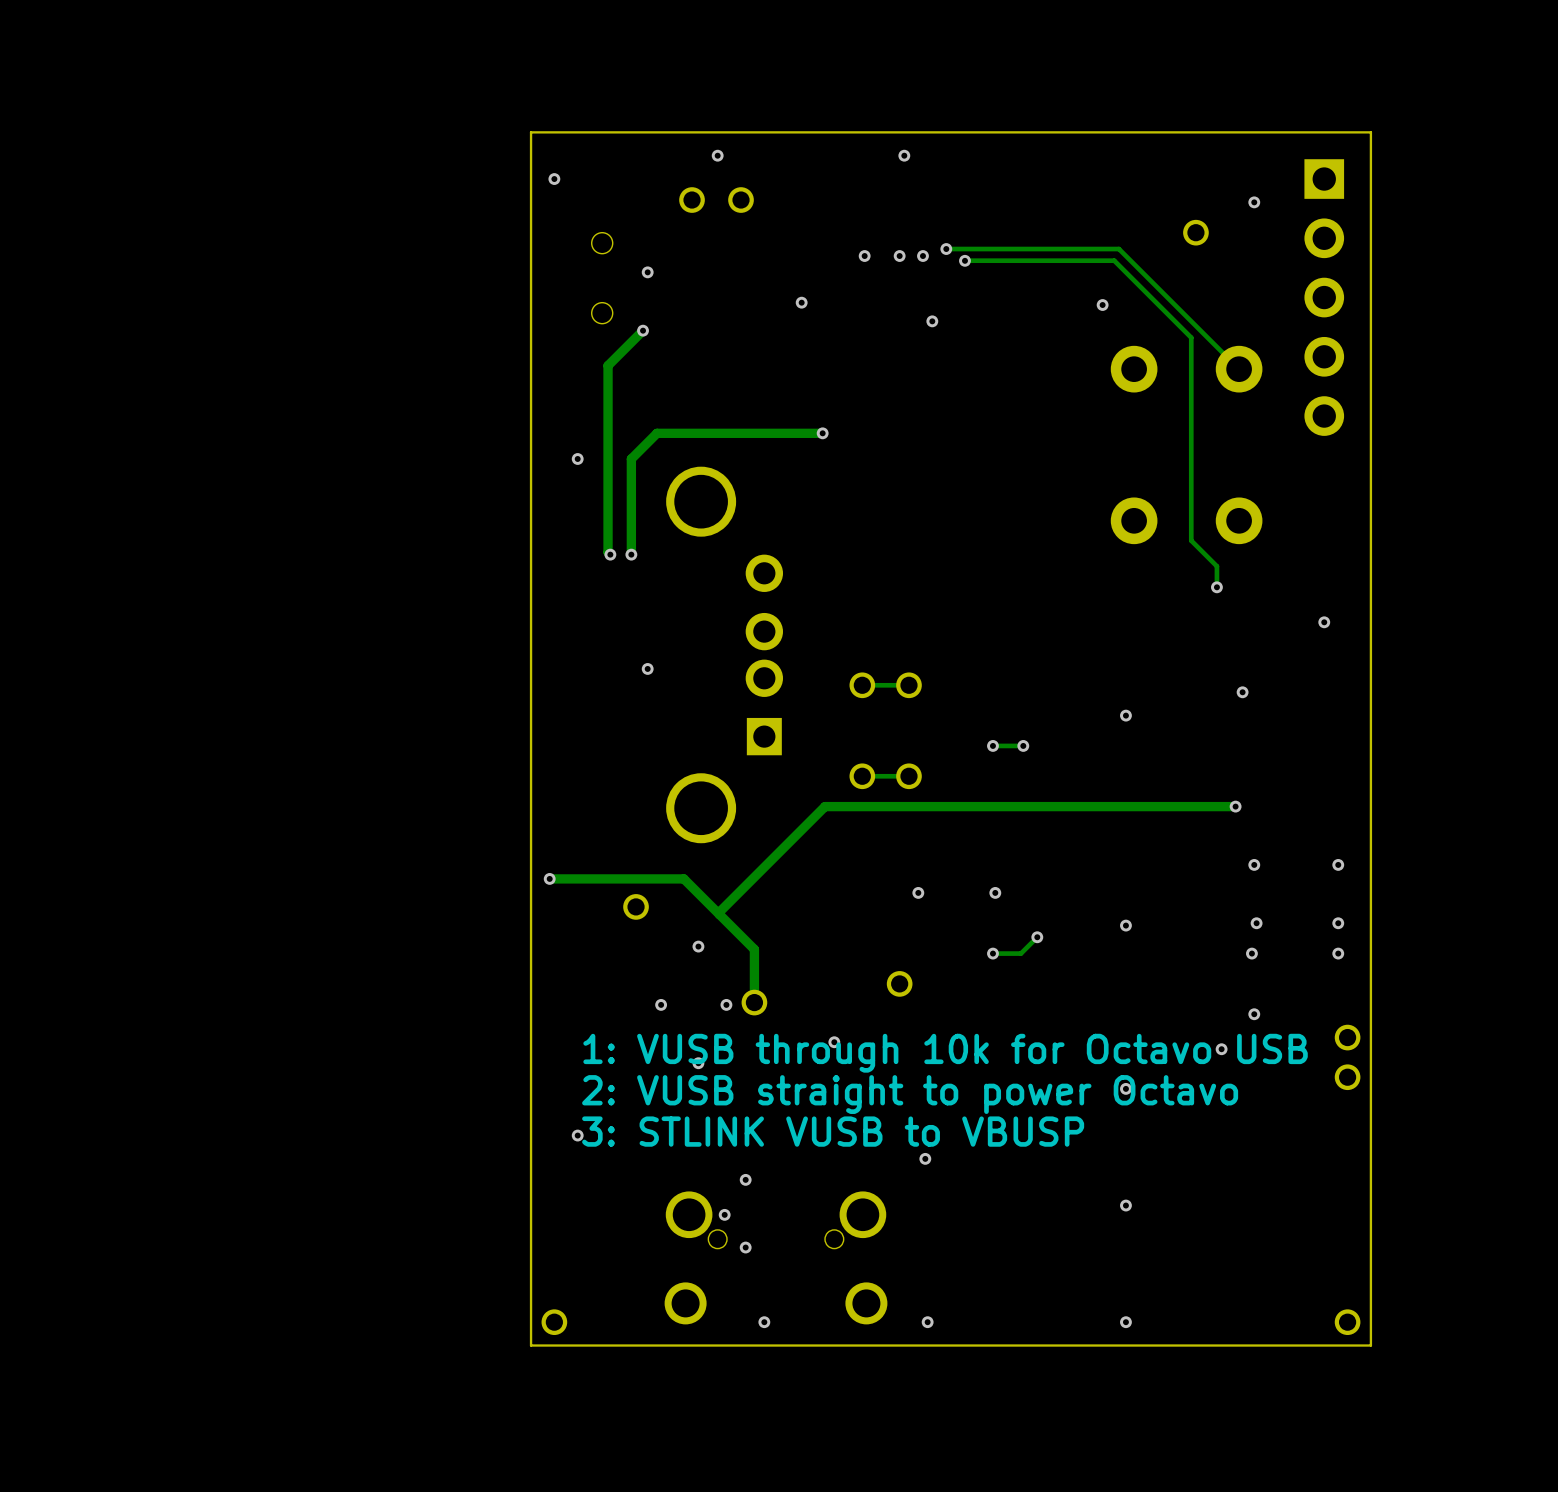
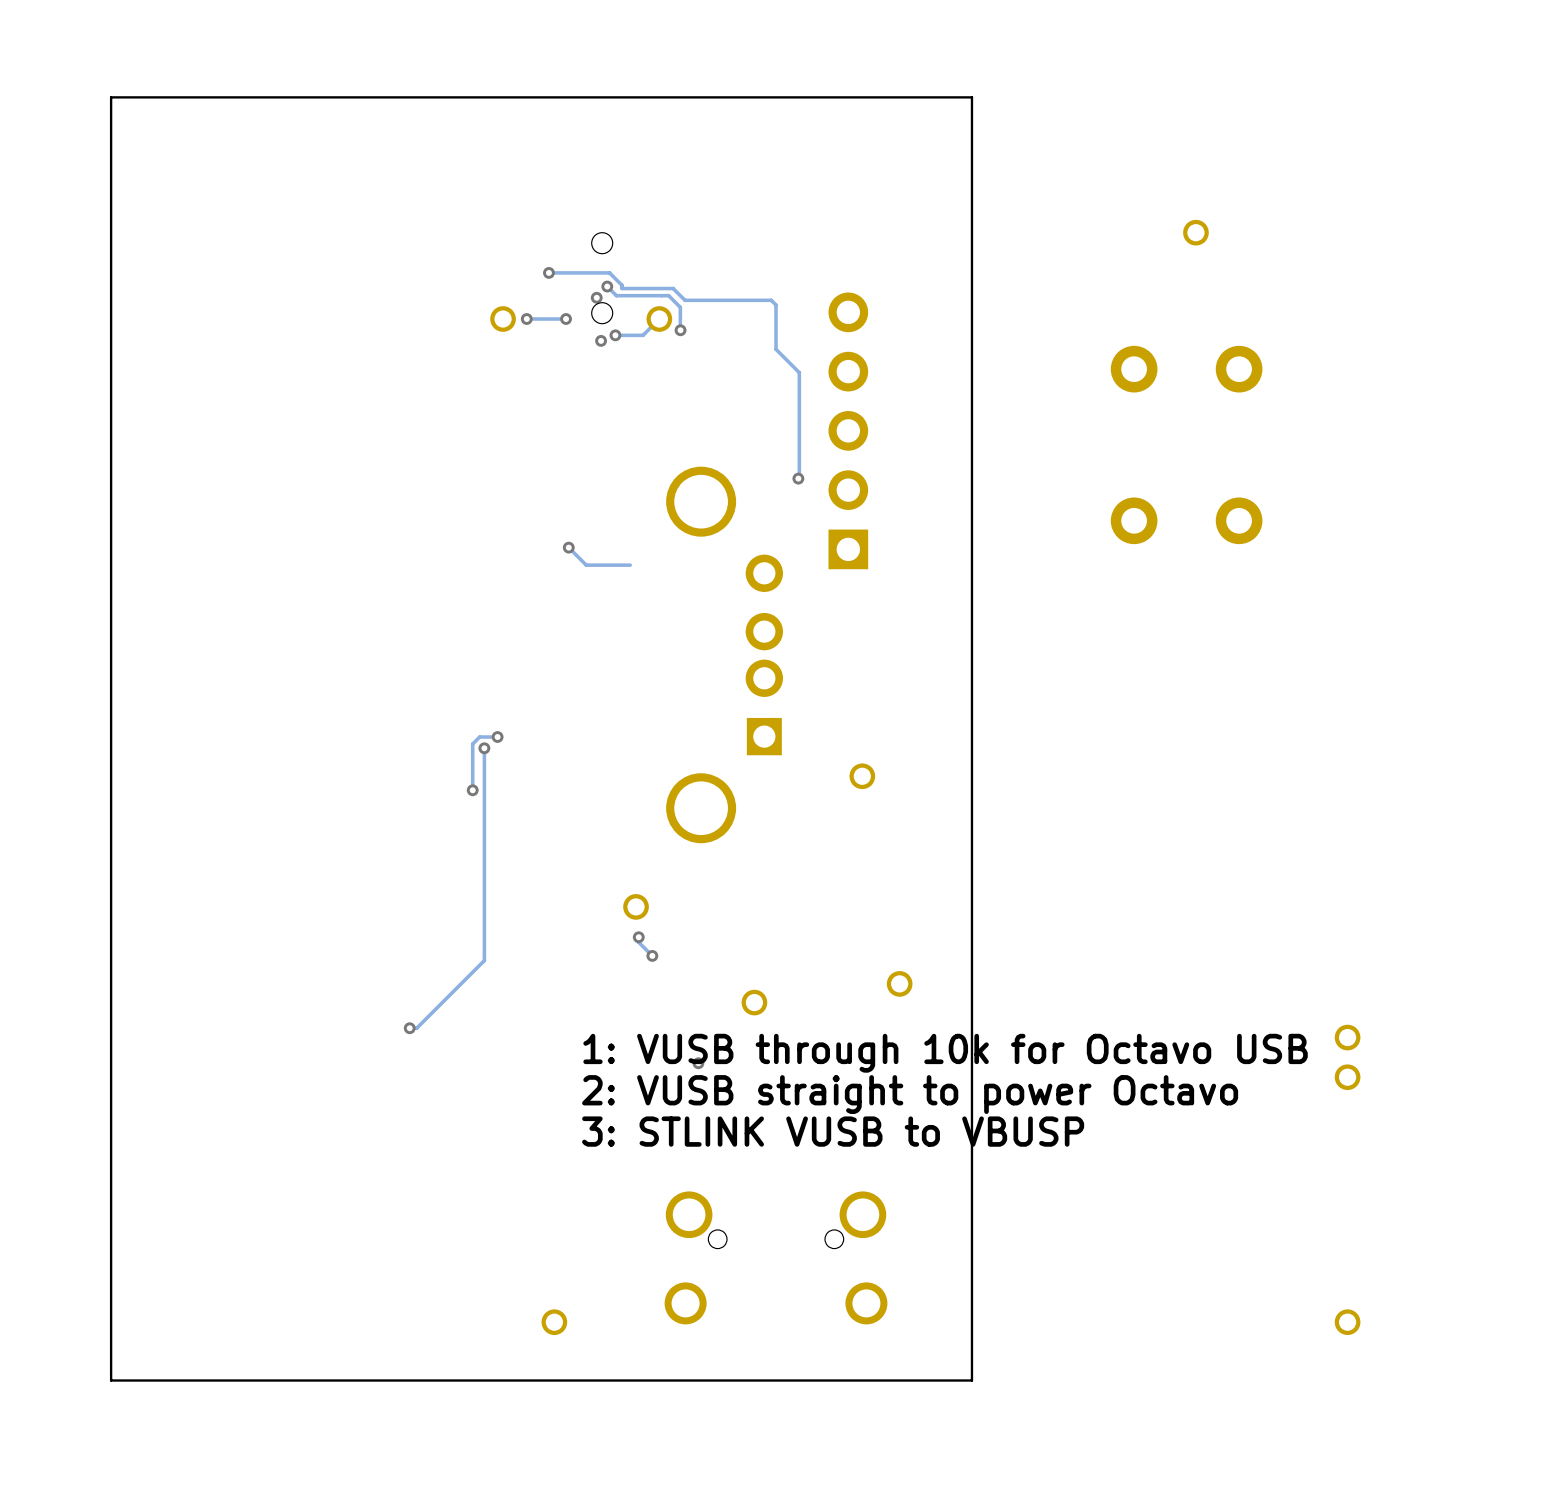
board edge: none -> (971, 97) (111, 97) (111, 1380) (971, 1380) (971, 97)
board edge: (1370, 132) (531, 132) (531, 1345) (1370, 1345) (1370, 132) -> none
via: (717, 155) -> none
via: (904, 155) -> none
via: (554, 179) -> none
part: (692, 200) -> none
part: (741, 200) -> none
via: (1254, 202) -> none
track: (946, 249) (1118, 249) (1239, 369) -> none
via: (946, 249) -> none
via: (864, 256) -> none
via: (899, 256) -> none
via: (922, 256) -> none
track: (964, 260) (1114, 260) (1191, 337) (1191, 540) (1216, 566) (1216, 587) -> none
via: (964, 260) -> none
track: none -> (548, 272) (609, 272) (622, 285) (622, 288) (673, 288) (685, 300) (771, 300) (776, 305) (776, 349) (799, 372) (798, 478)
via: none -> (548, 272)
via: (647, 272) -> none
track: none -> (607, 286) (616, 295) (668, 295) (680, 307) (680, 330)
via: none -> (607, 286)
via: none -> (596, 297)
part rotation: 0° (1324, 297) -> 180° (848, 430)
part position: (1324, 297) -> (848, 430)
via: (801, 302) -> none
via: (1102, 305) -> none
part: none -> (503, 319)
via: none -> (526, 319)
track: none -> (566, 319) (526, 319)
via: none -> (566, 319)
track: none -> (659, 319) (643, 335) (615, 335)
part: none -> (659, 319)
via: (932, 321) -> none
track: (643, 330) (608, 365) (608, 552) (610, 554) -> none
via: (643, 330) -> none
via: none -> (680, 330)
via: none -> (615, 335)
via: none -> (601, 340)
track: (822, 433) (657, 433) (631, 458) (631, 554) -> none
via position: (822, 433) -> (798, 478)
via: (577, 458) -> none
track: none -> (568, 547) (586, 565) (630, 565)
via: none -> (568, 547)
via: (610, 554) -> none
via: (631, 554) -> none
via: (1216, 587) -> none
via: (1324, 622) -> none
via: (647, 668) -> none
part: (862, 685) -> none
track: (908, 685) (862, 685) -> none
part: (908, 685) -> none
via: (1242, 692) -> none
via: (1125, 715) -> none
track: none -> (497, 737) (479, 737) (472, 743) (472, 790)
via: none -> (497, 737)
via: (992, 745) -> none
track: (1023, 745) (992, 745) -> none
via: (1023, 745) -> none
track: none -> (484, 748) (484, 960) (416, 1028) (409, 1028)
via: none -> (484, 748)
track: (908, 776) (862, 776) -> none
part: (908, 776) -> none
via: none -> (472, 790)
track: (1234, 806) (825, 806) (719, 912) (719, 914) -> none
via: (1235, 806) -> none
via: (1254, 864) -> none
via: (1338, 864) -> none
track: (549, 878) (683, 878) (754, 949) (754, 1002) -> none
via: (549, 878) -> none
via: (918, 892) -> none
via: (995, 892) -> none
via: (1256, 923) -> none
via: (1338, 923) -> none
via: (1125, 925) -> none
track: none -> (638, 937) (638, 942) (652, 955)
via: none -> (638, 937)
track: (1037, 937) (1020, 953) (992, 953) -> none
via: (1037, 937) -> none
via: (698, 946) -> none
via: (992, 953) -> none
via: (1251, 953) -> none
via: (1338, 953) -> none
via: none -> (652, 955)
via: (661, 1004) -> none
via: (726, 1004) -> none
via: (1254, 1014) -> none
via: none -> (409, 1028)
via: (834, 1042) -> none
via: (1221, 1049) -> none
via: (1125, 1088) -> none
via: (577, 1135) -> none
via: (925, 1158) -> none
via: (745, 1179) -> none
via: (1125, 1205) -> none
via: (724, 1214) -> none
via: (745, 1247) -> none
via: (764, 1322) -> none
via: (927, 1322) -> none
via: (1125, 1322) -> none

